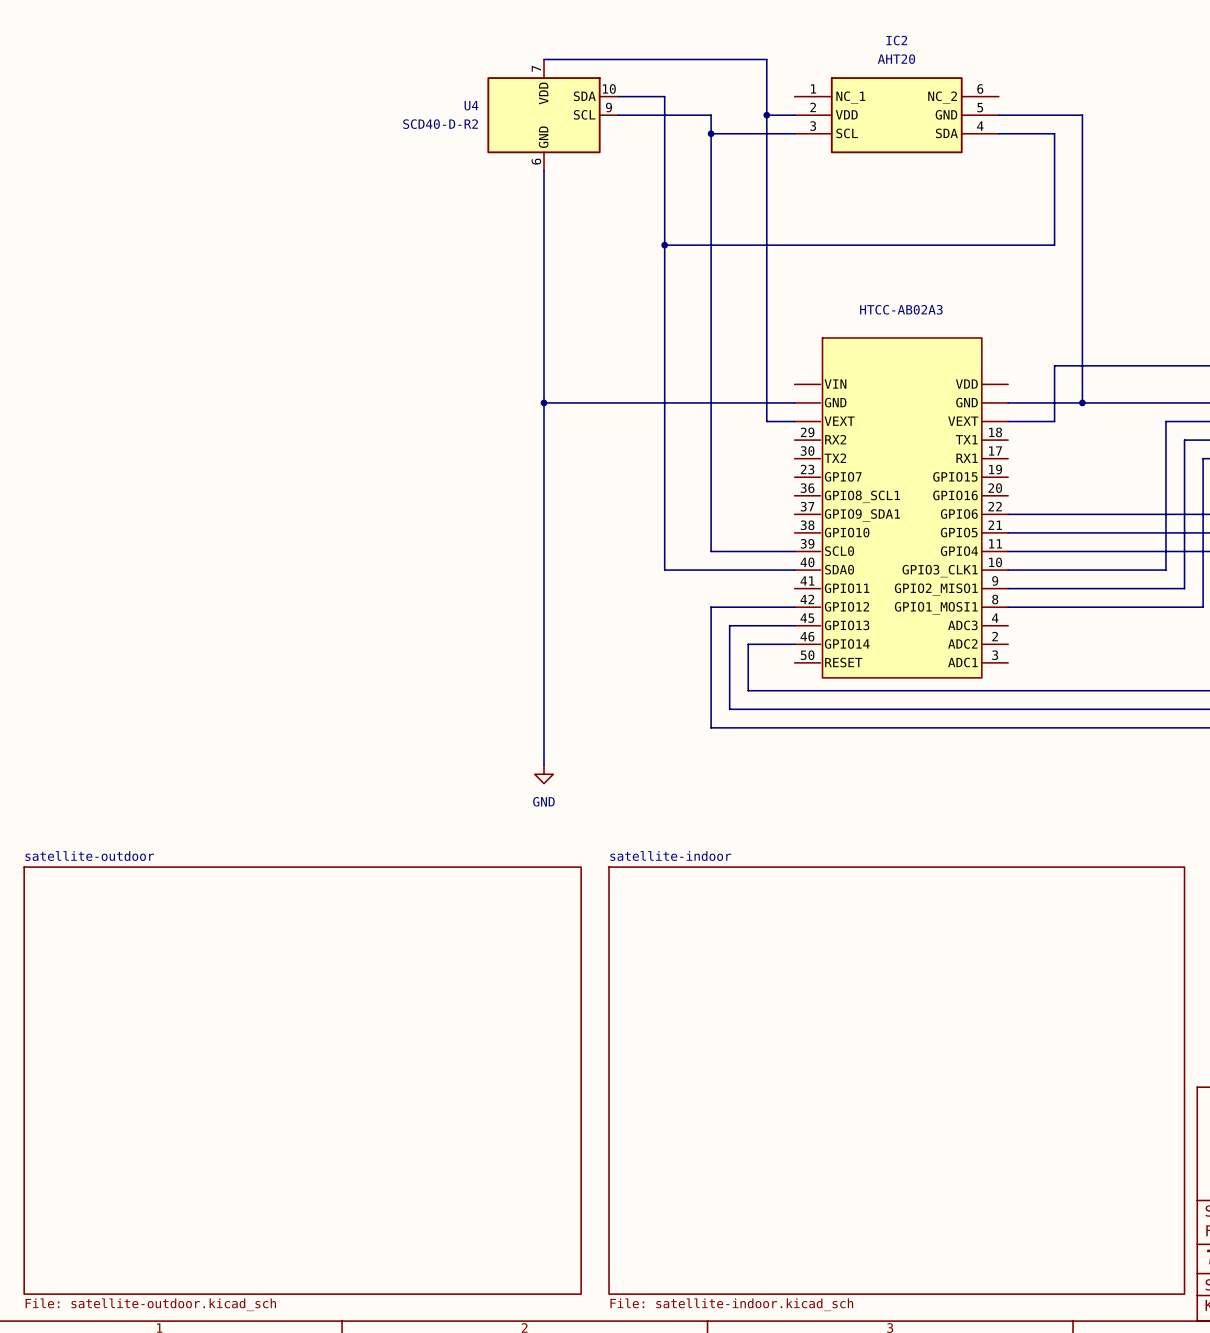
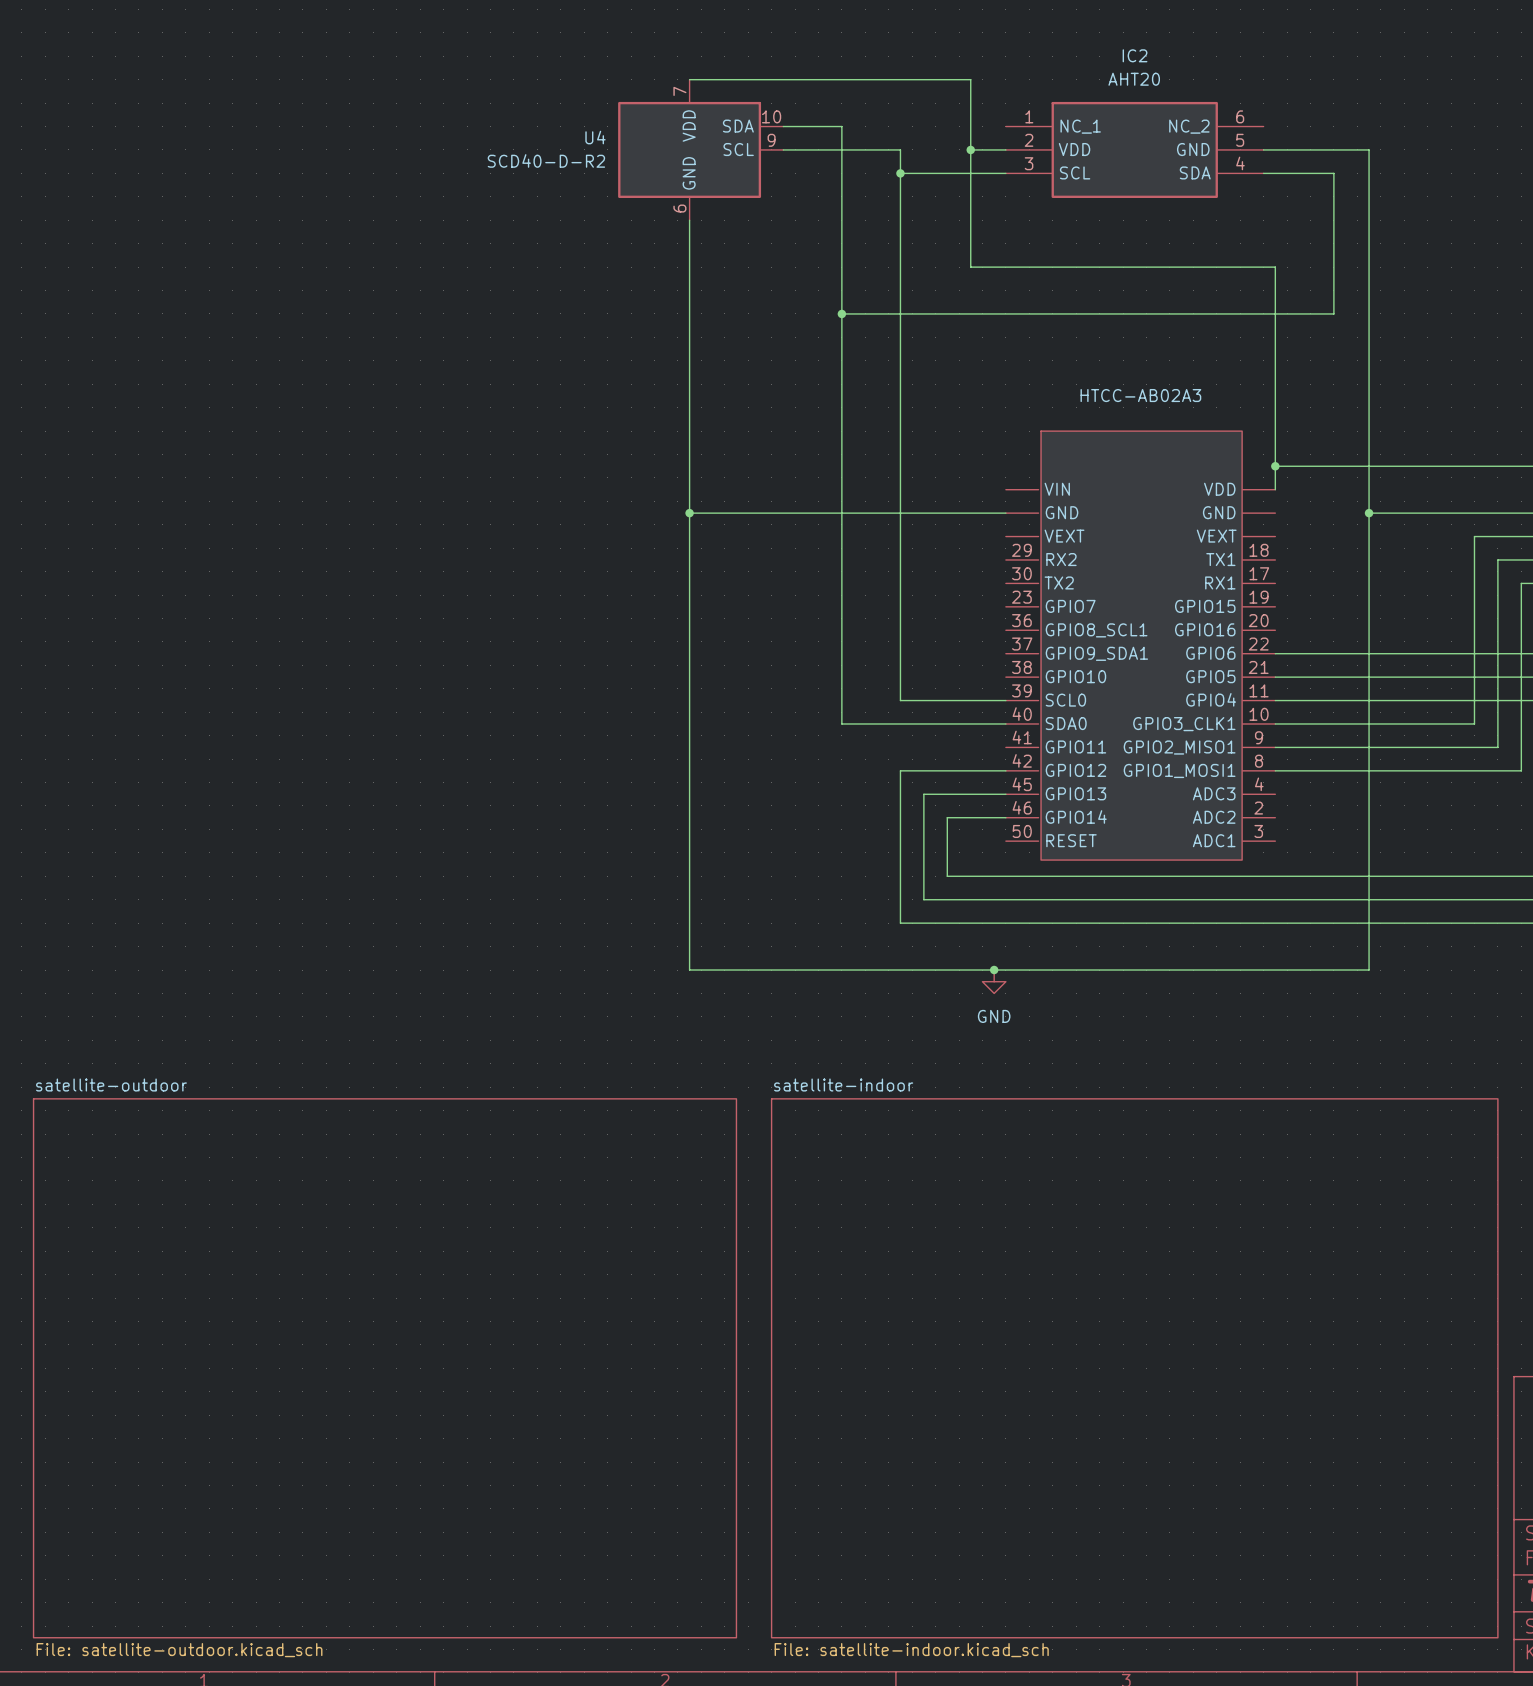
wire: (766, 208) (766, 421) (794, 421) -> (970, 267) (1275, 267) (1275, 489)
junction: none -> (1275, 466)
wire: (1054, 365) (1054, 421) (1008, 421) -> (1333, 466) (1275, 466)
wire: (1008, 402) (1082, 402) -> (689, 970) (1369, 970) (1369, 513)
junction: none -> (994, 970)
power symbol: GND (544, 774) -> none
power symbol: none -> GND (994, 981)

